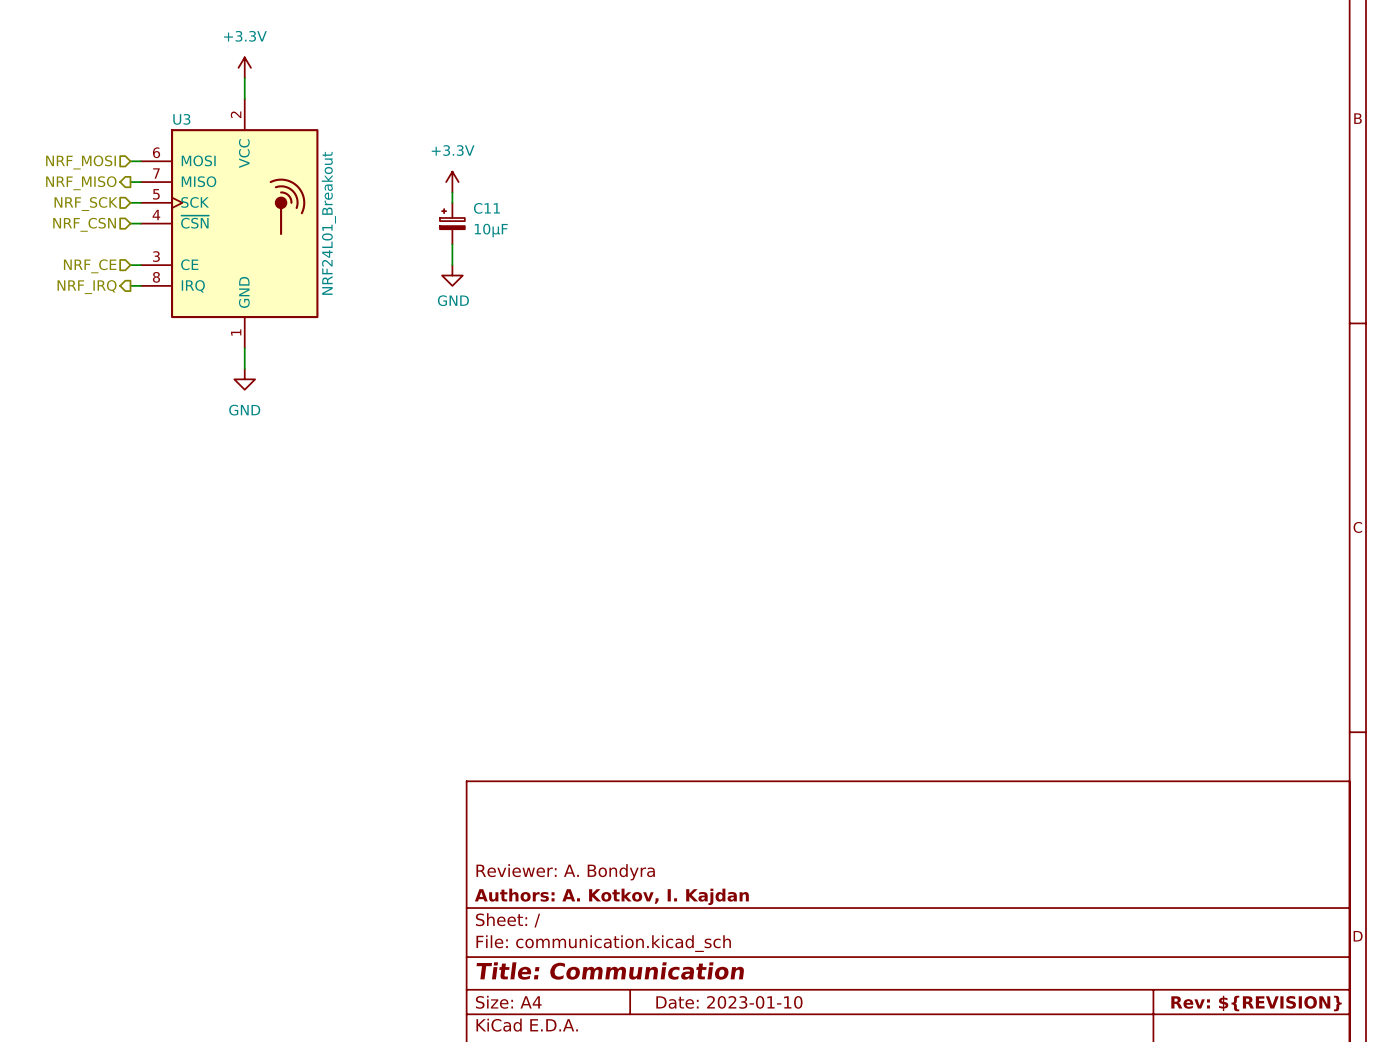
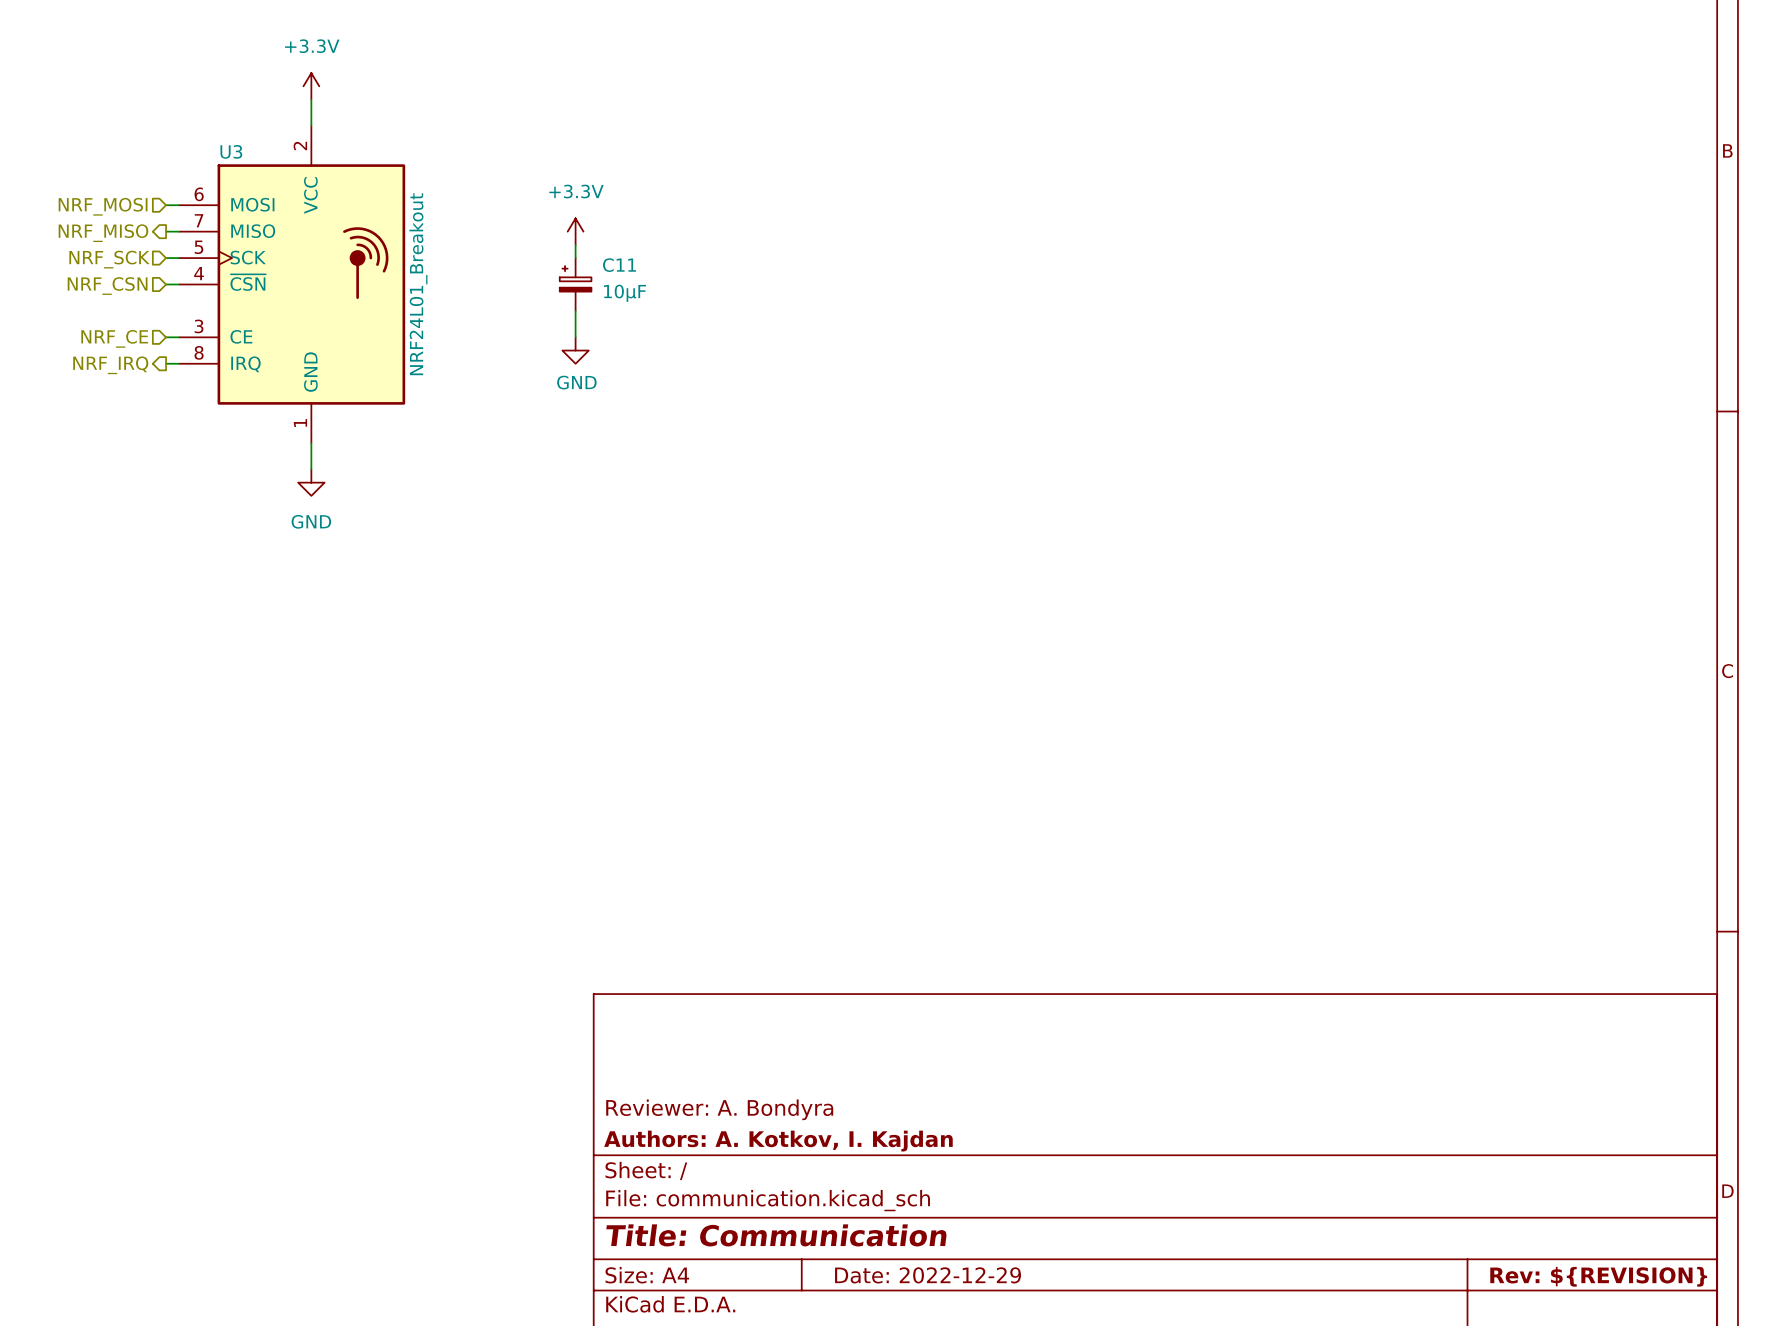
title block: Date: 2023-01-10 (729, 1002) -> Date: 2022-12-29 (928, 1275)

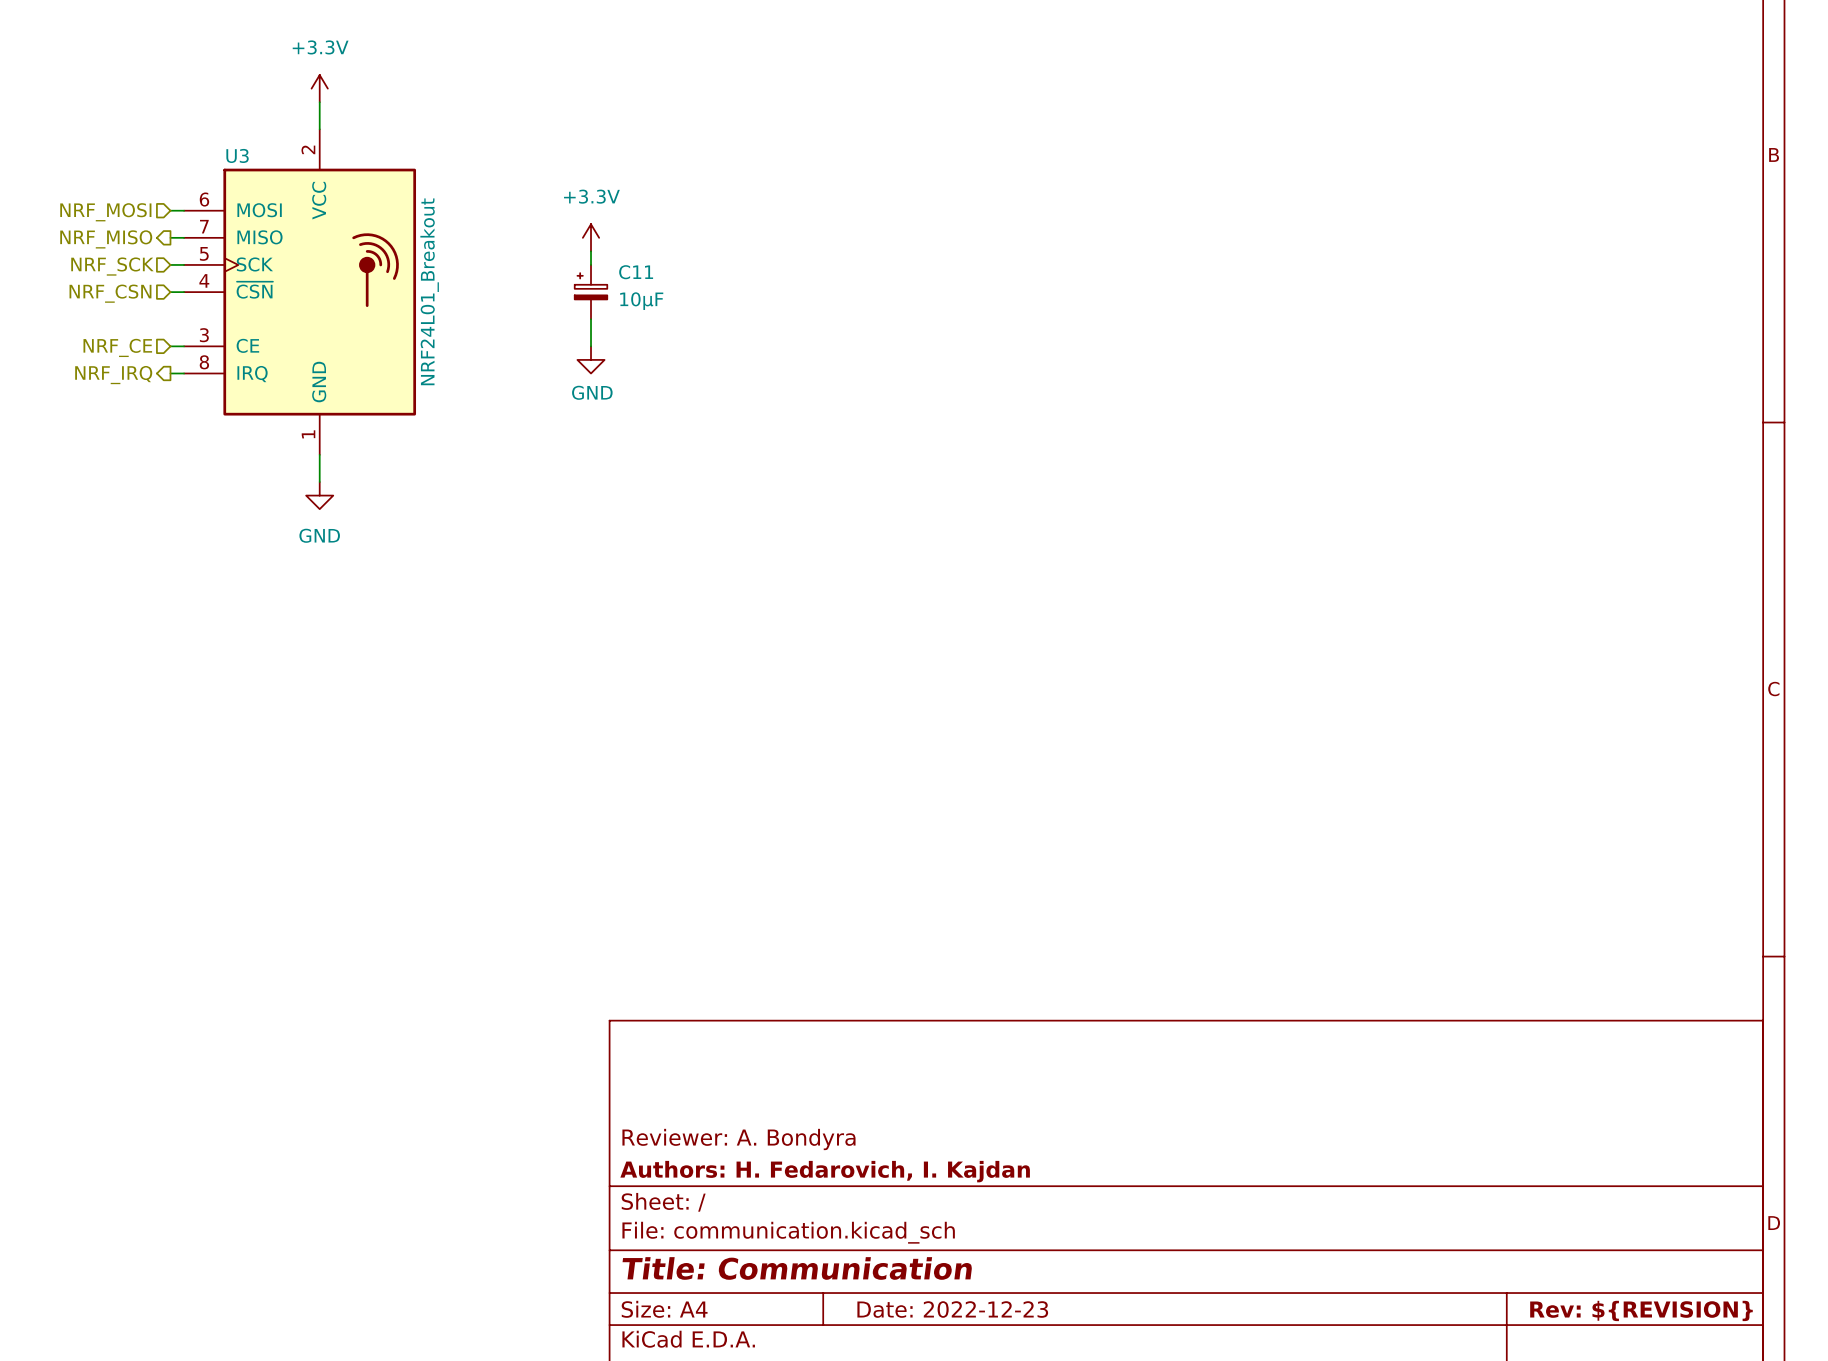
title block: Authors: A. Kotkov, I. Kajdan (778, 1141) -> Authors: H. Fedarovich, I. Kajdan (825, 1171)
title block: Date: 2022-12-29 (928, 1275) -> Date: 2022-12-23 (952, 1309)

